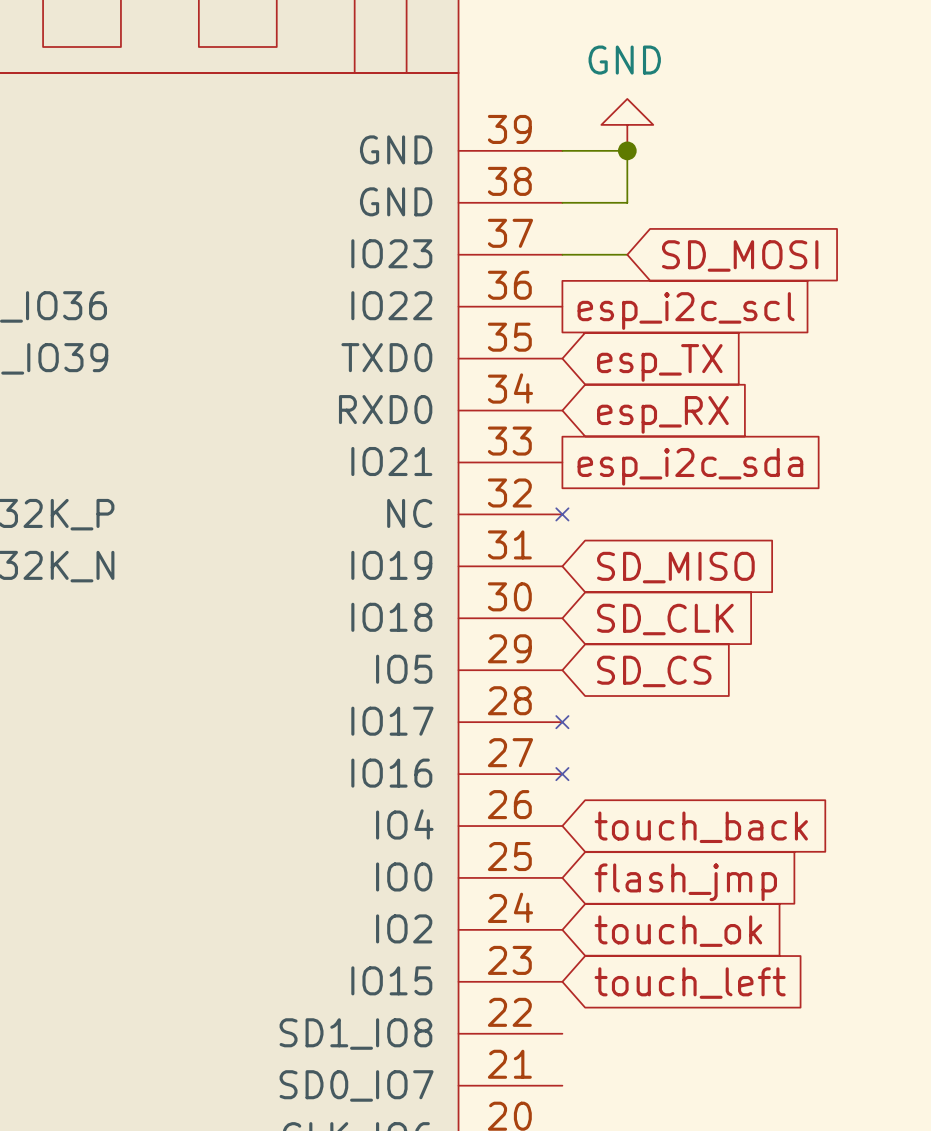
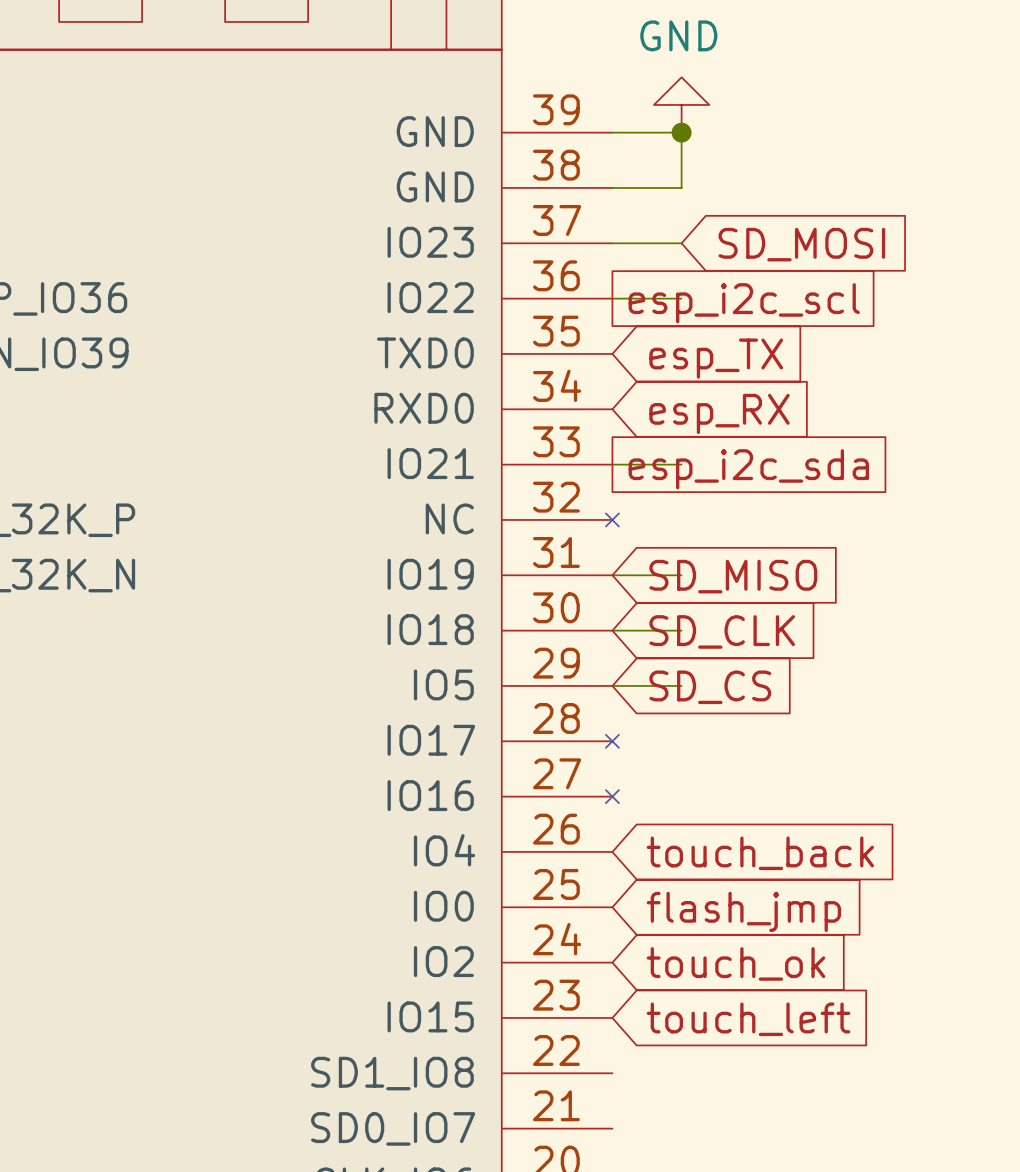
wire: none -> (612, 298) (681, 298)
wire: none -> (612, 464) (681, 464)
wire: none -> (612, 575) (681, 575)
wire: none -> (612, 630) (681, 630)
wire: none -> (612, 685) (681, 685)

